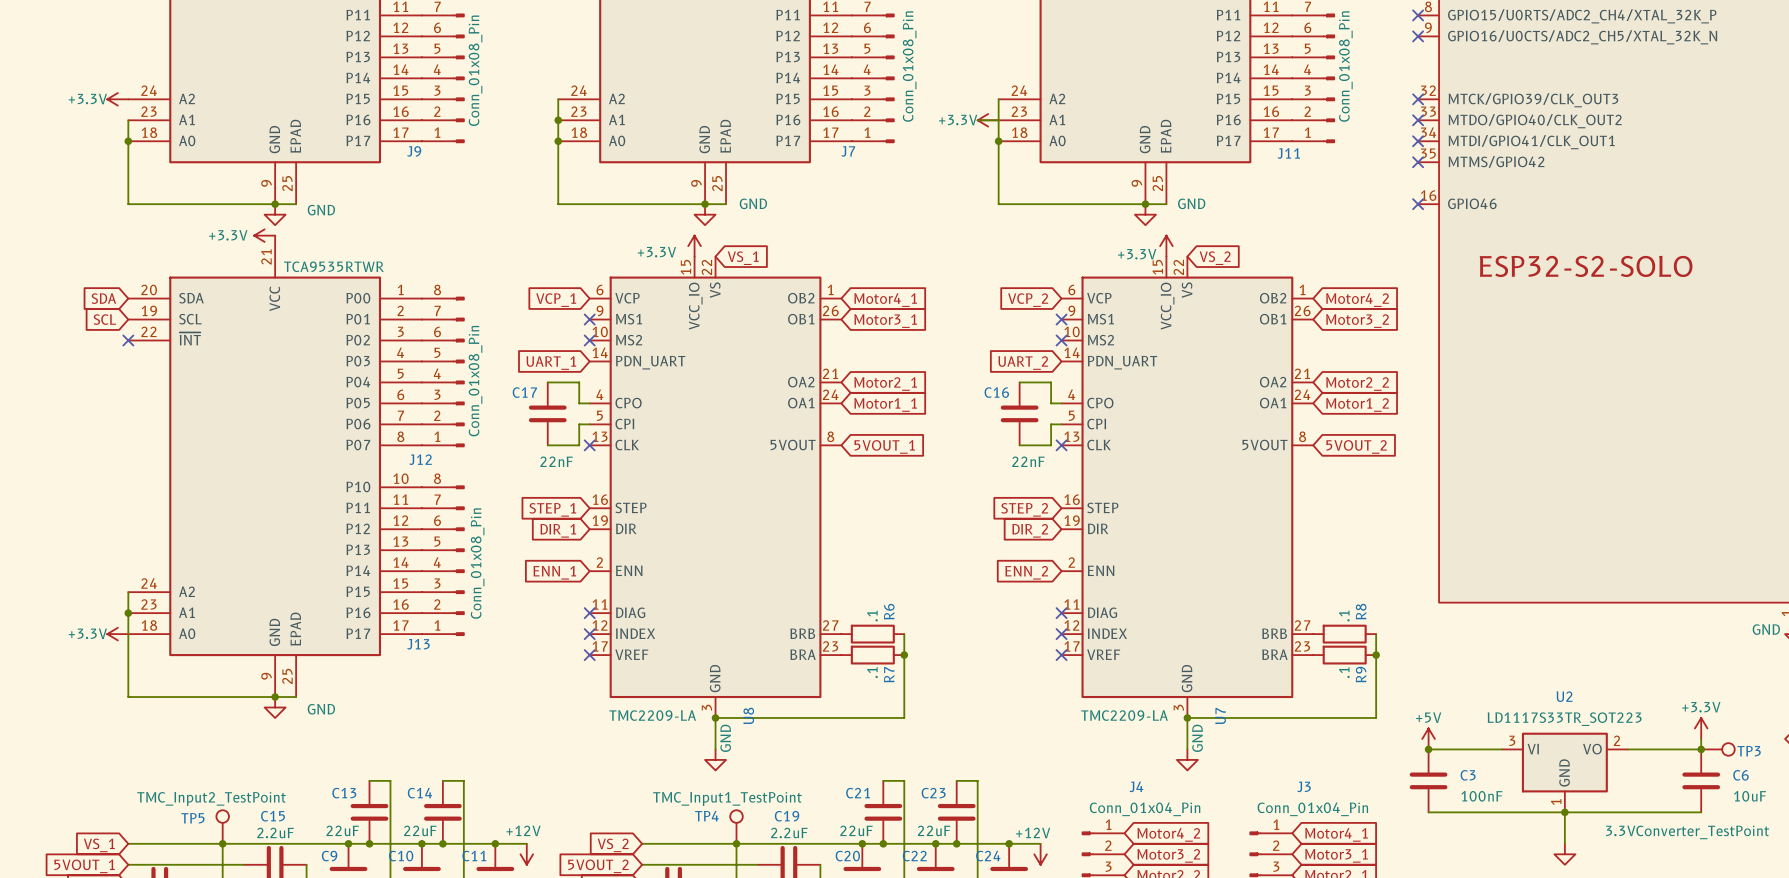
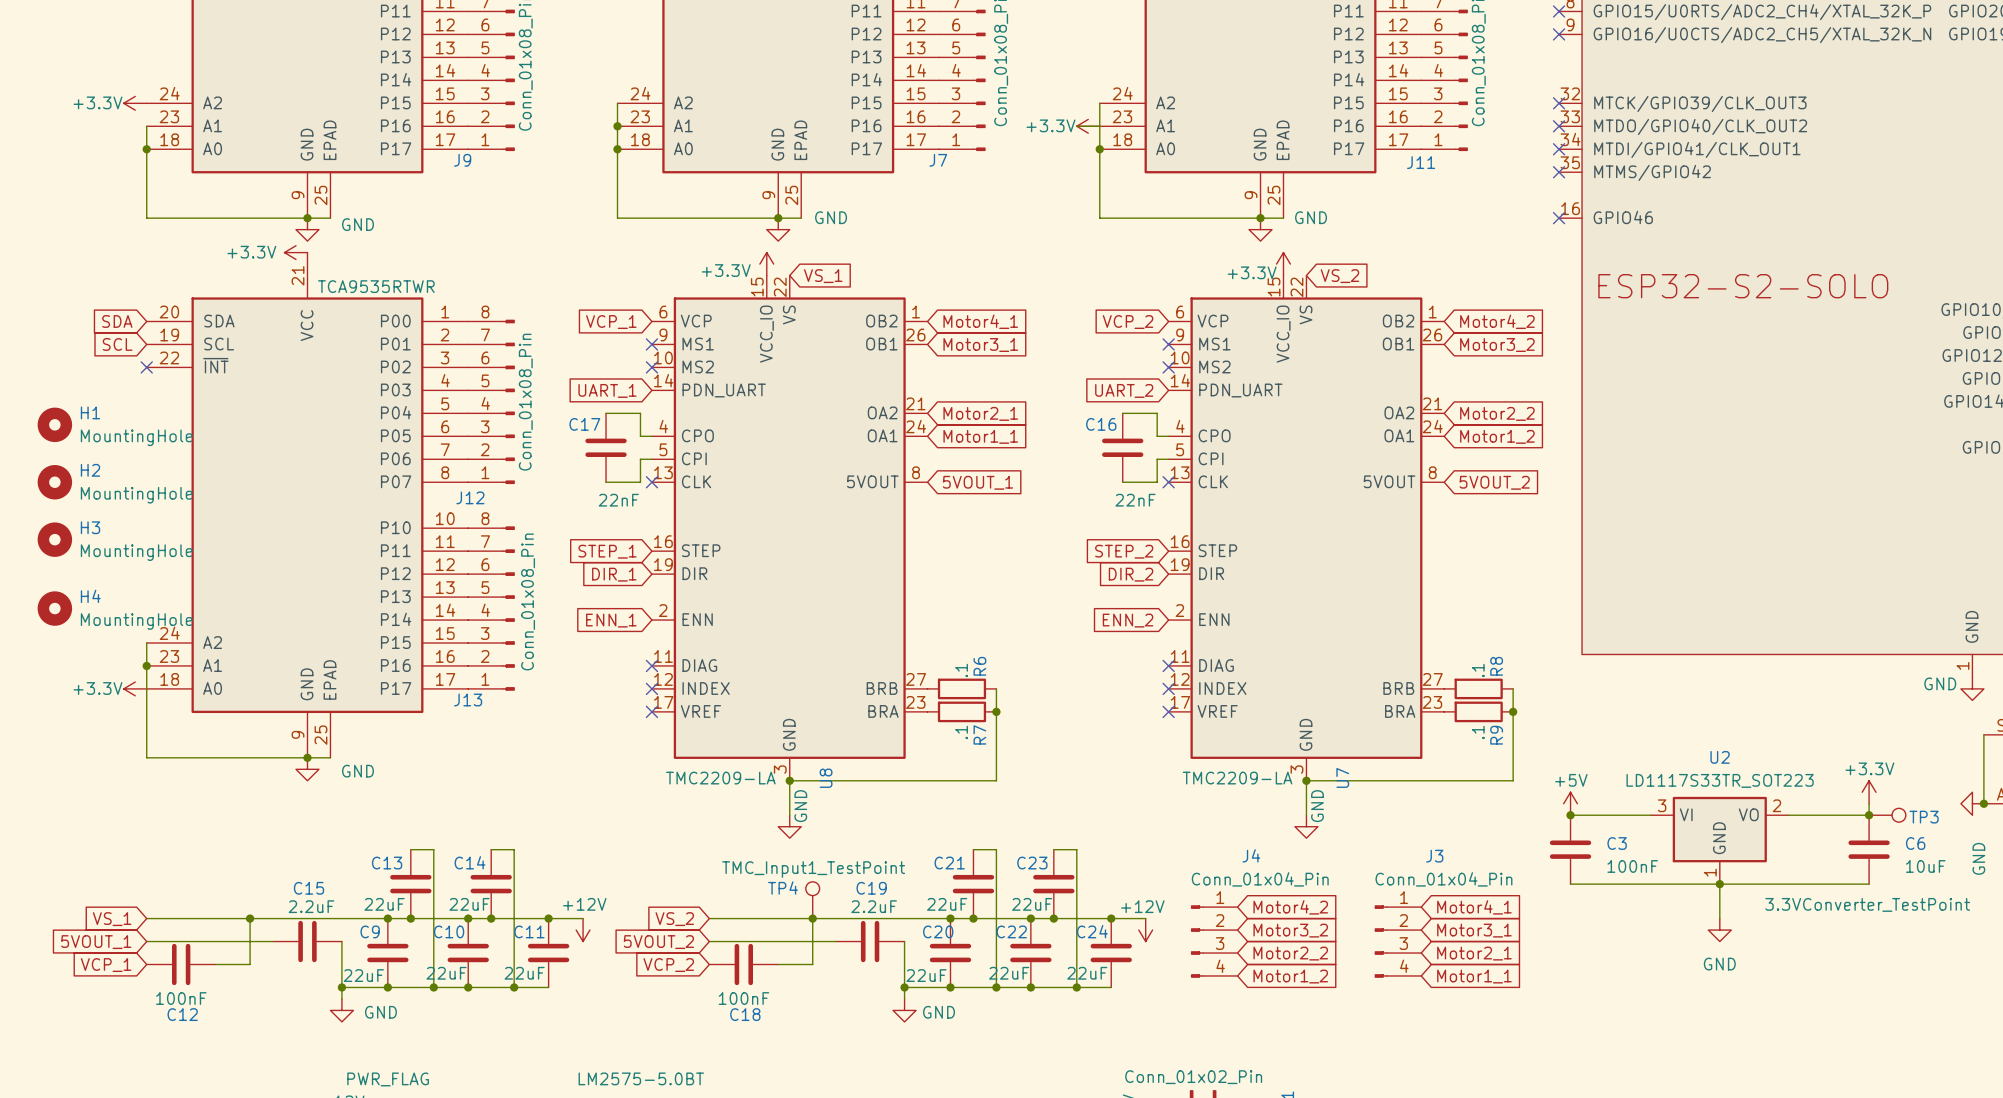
H1: none -> MountingHole (54, 424)
H2: none -> MountingHole (54, 482)
H3: none -> MountingHole (54, 539)
H4: none -> MountingHole (54, 608)
TP5: TMC_Input2_TestPoint (222, 827) -> none

